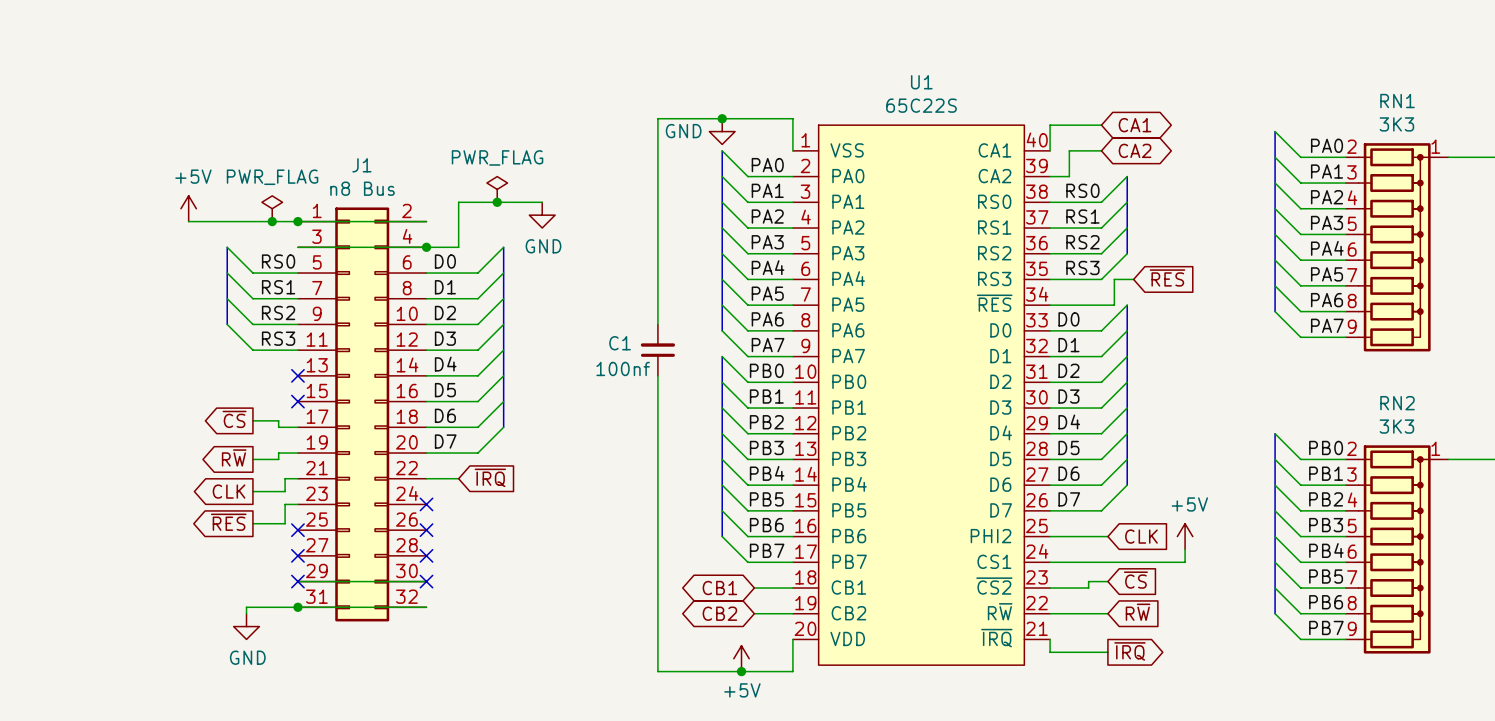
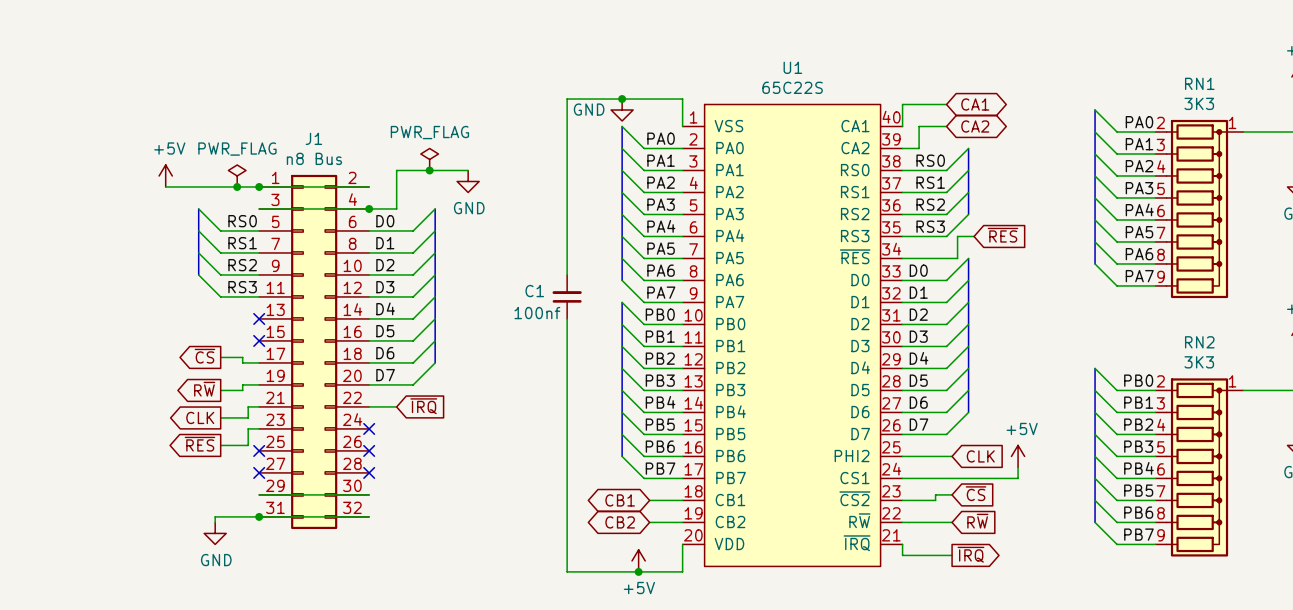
no-connect mark: (297, 581) -> none
no-connect mark: (426, 581) -> none

